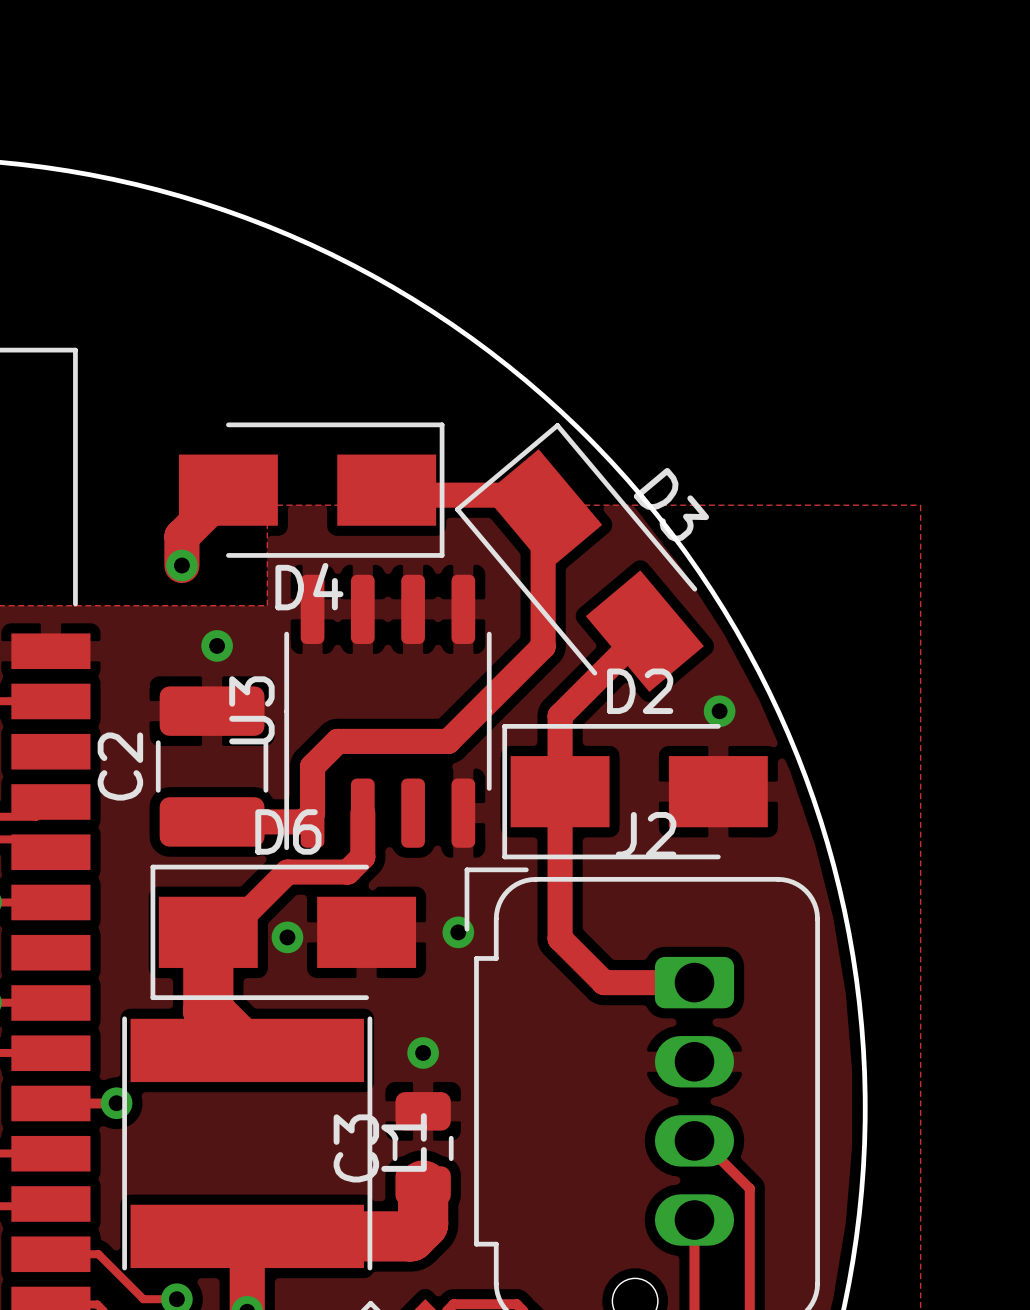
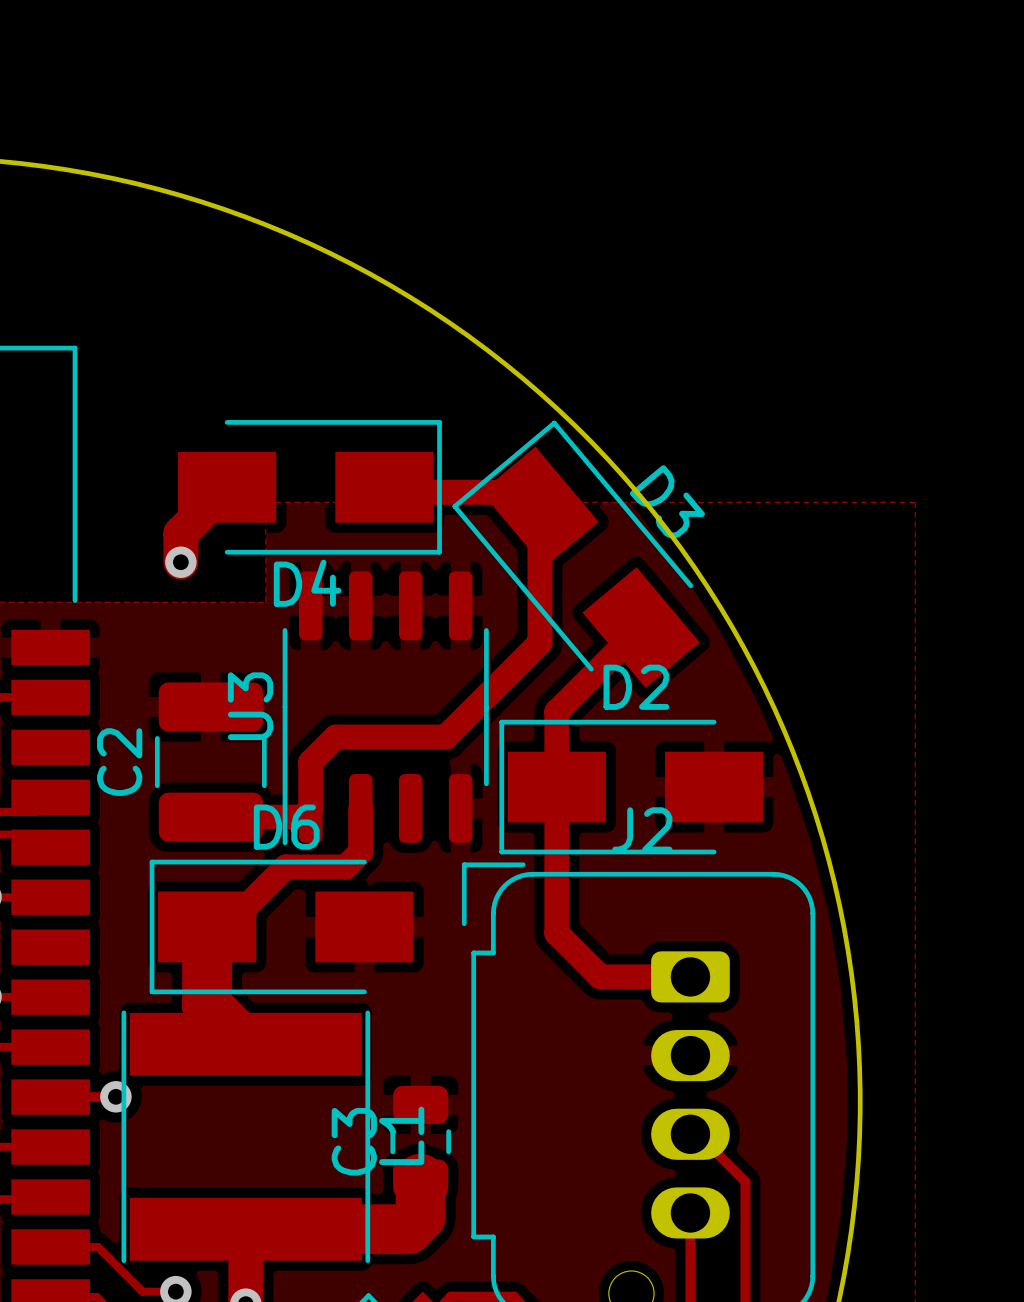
via: (217, 645) -> none
via: (719, 711) -> none
via: (458, 932) -> none
via: (287, 937) -> none
via: (423, 1052) -> none

